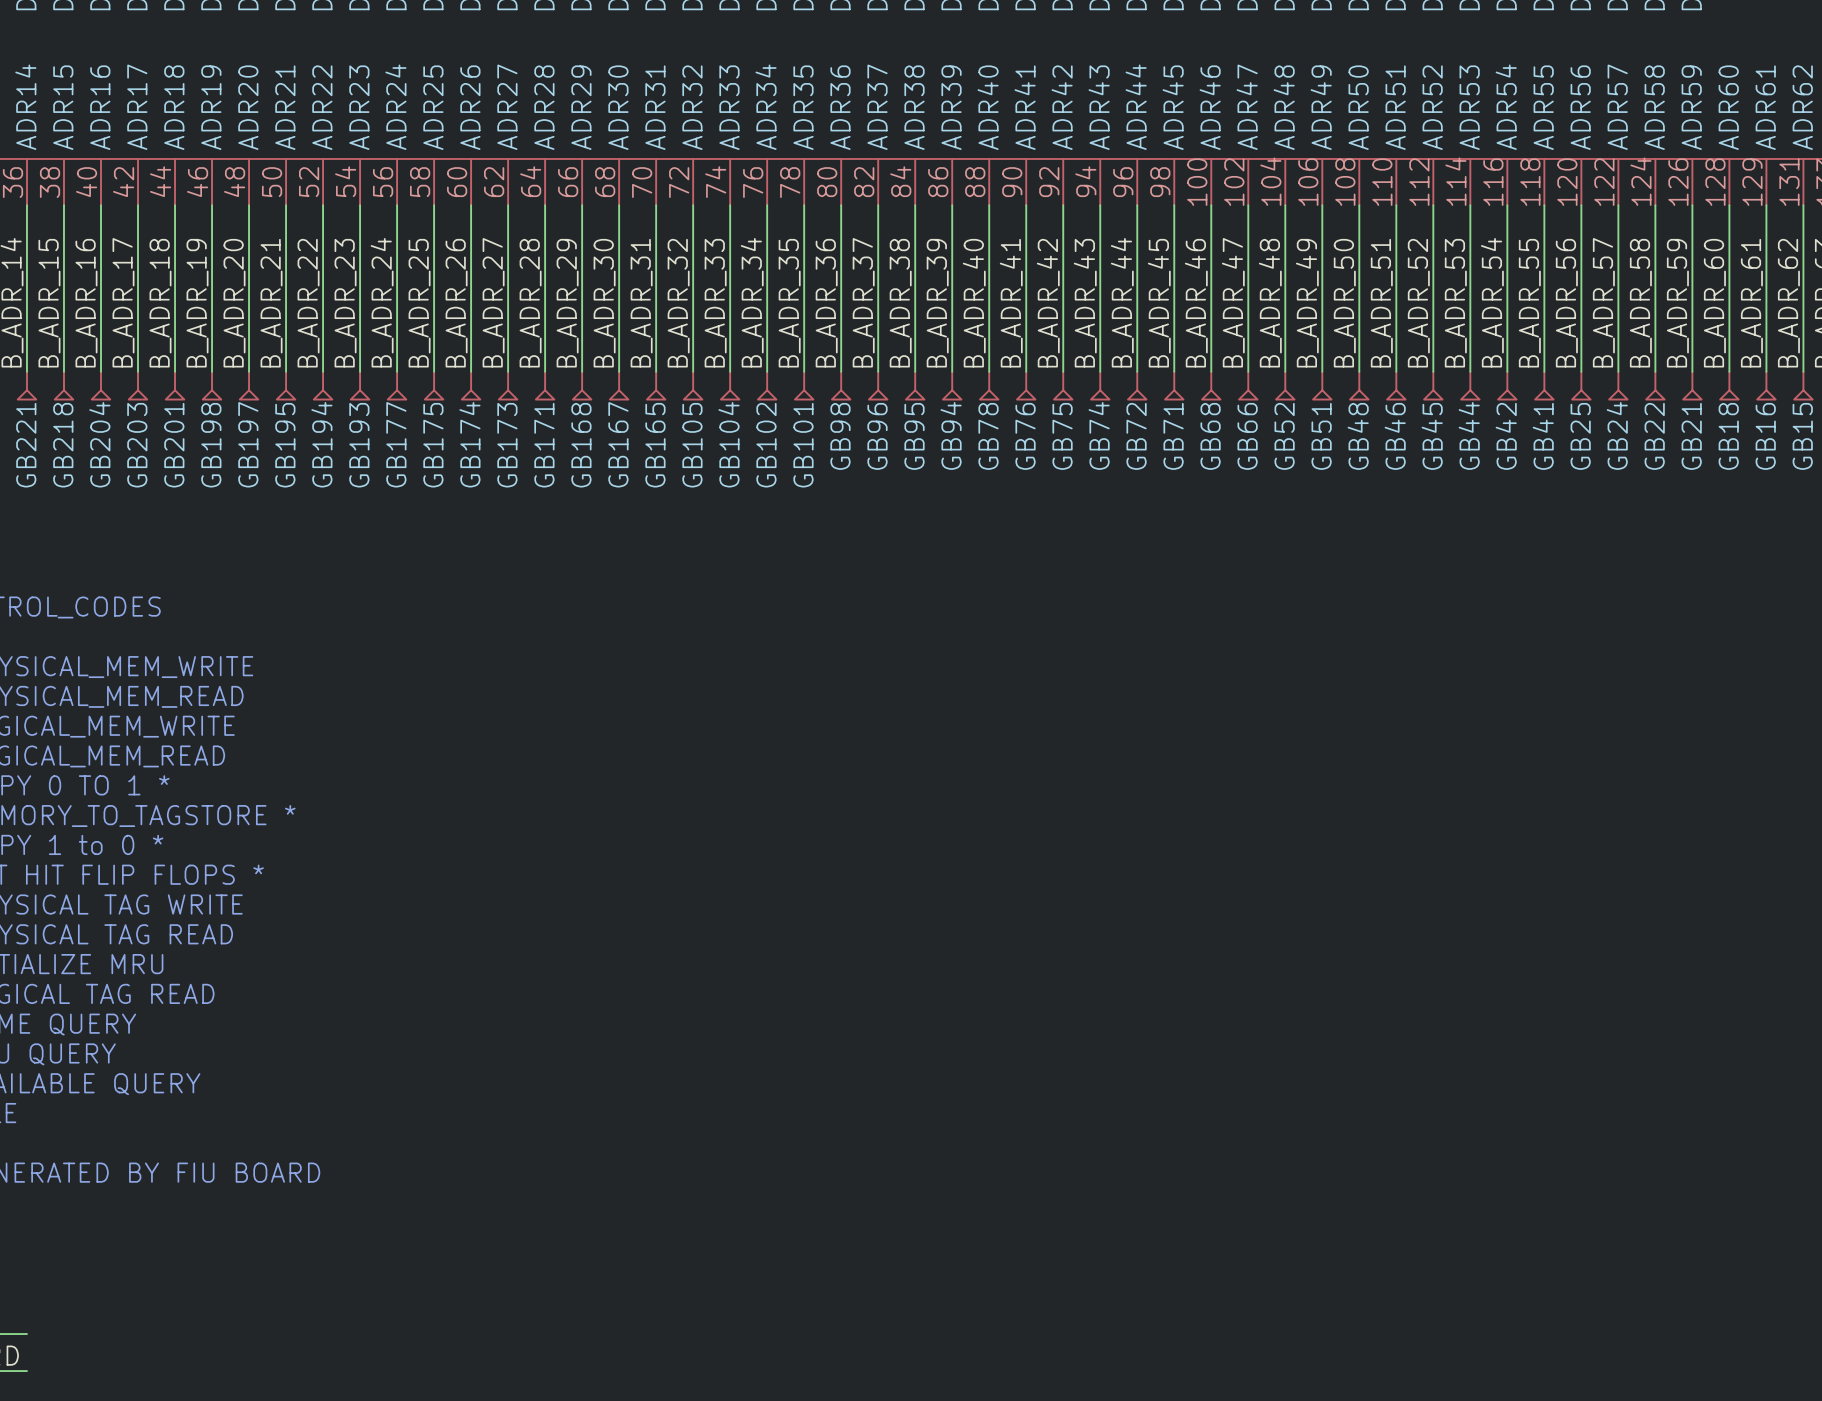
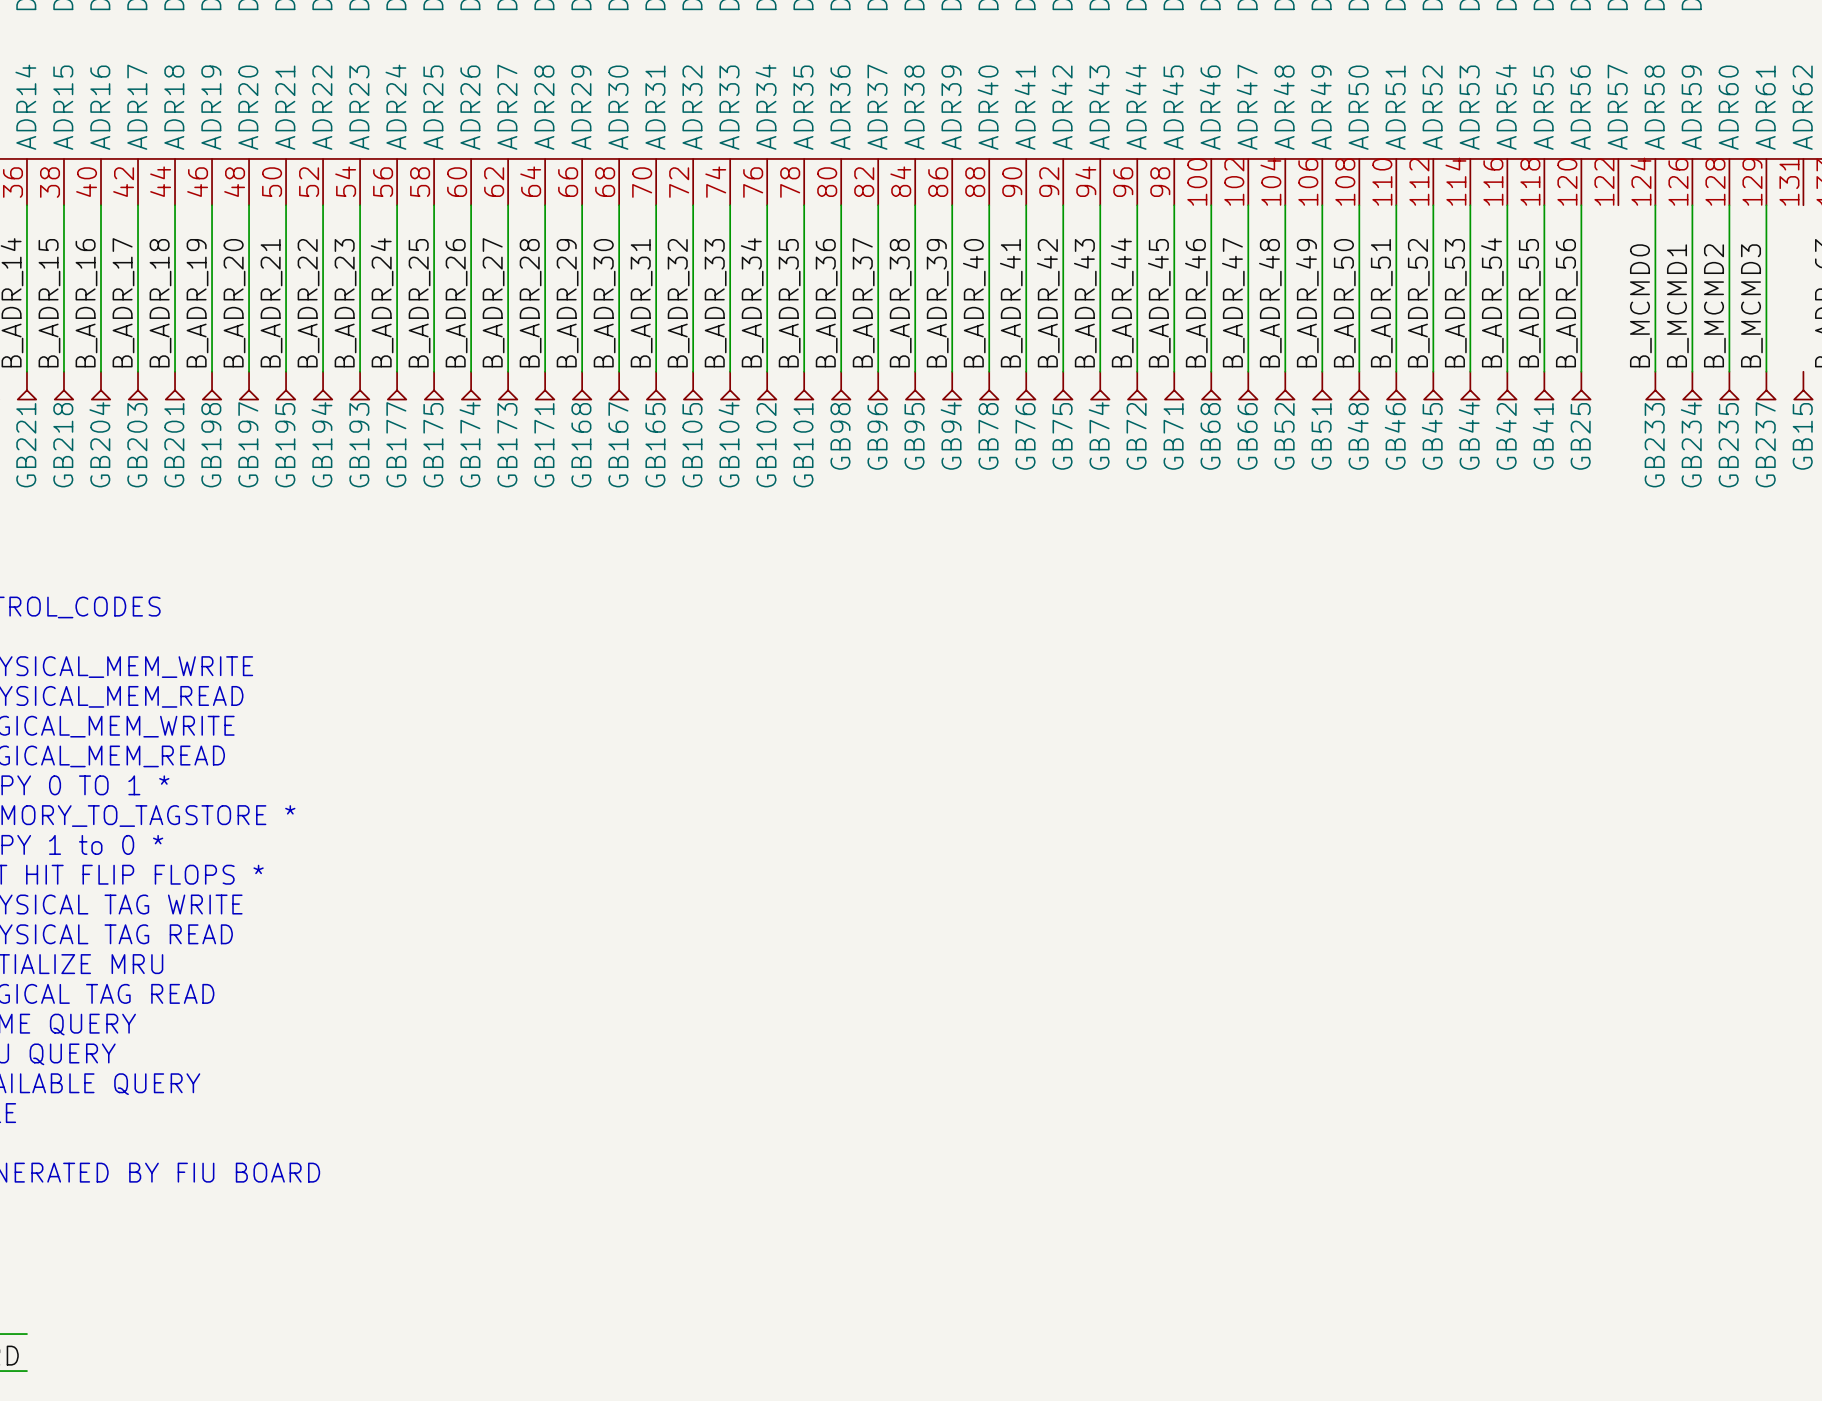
wire: (1618, 205) (1618, 371) -> none
wire: (1803, 205) (1803, 371) -> none
label: B_ADR_57 (1603, 302) -> none
label: B_ADR_58 (1640, 303) -> B_MCMD0 (1640, 305)
label: B_ADR_59 (1677, 303) -> B_MCMD1 (1677, 305)
label: B_ADR_60 (1714, 303) -> B_MCMD2 (1714, 305)
label: B_ADR_61 (1751, 303) -> B_MCMD3 (1751, 305)
label: B_ADR_62 (1788, 303) -> none
GB24: (1618, 385) -> none
GB22 name: GB22 (1654, 436) -> GB233 (1654, 445)
GB21 name: GB21 (1691, 436) -> GB234 (1691, 444)
GB18 name: GB18 (1728, 436) -> GB235 (1728, 445)
GB16 name: GB16 (1765, 436) -> GB237 (1765, 444)

